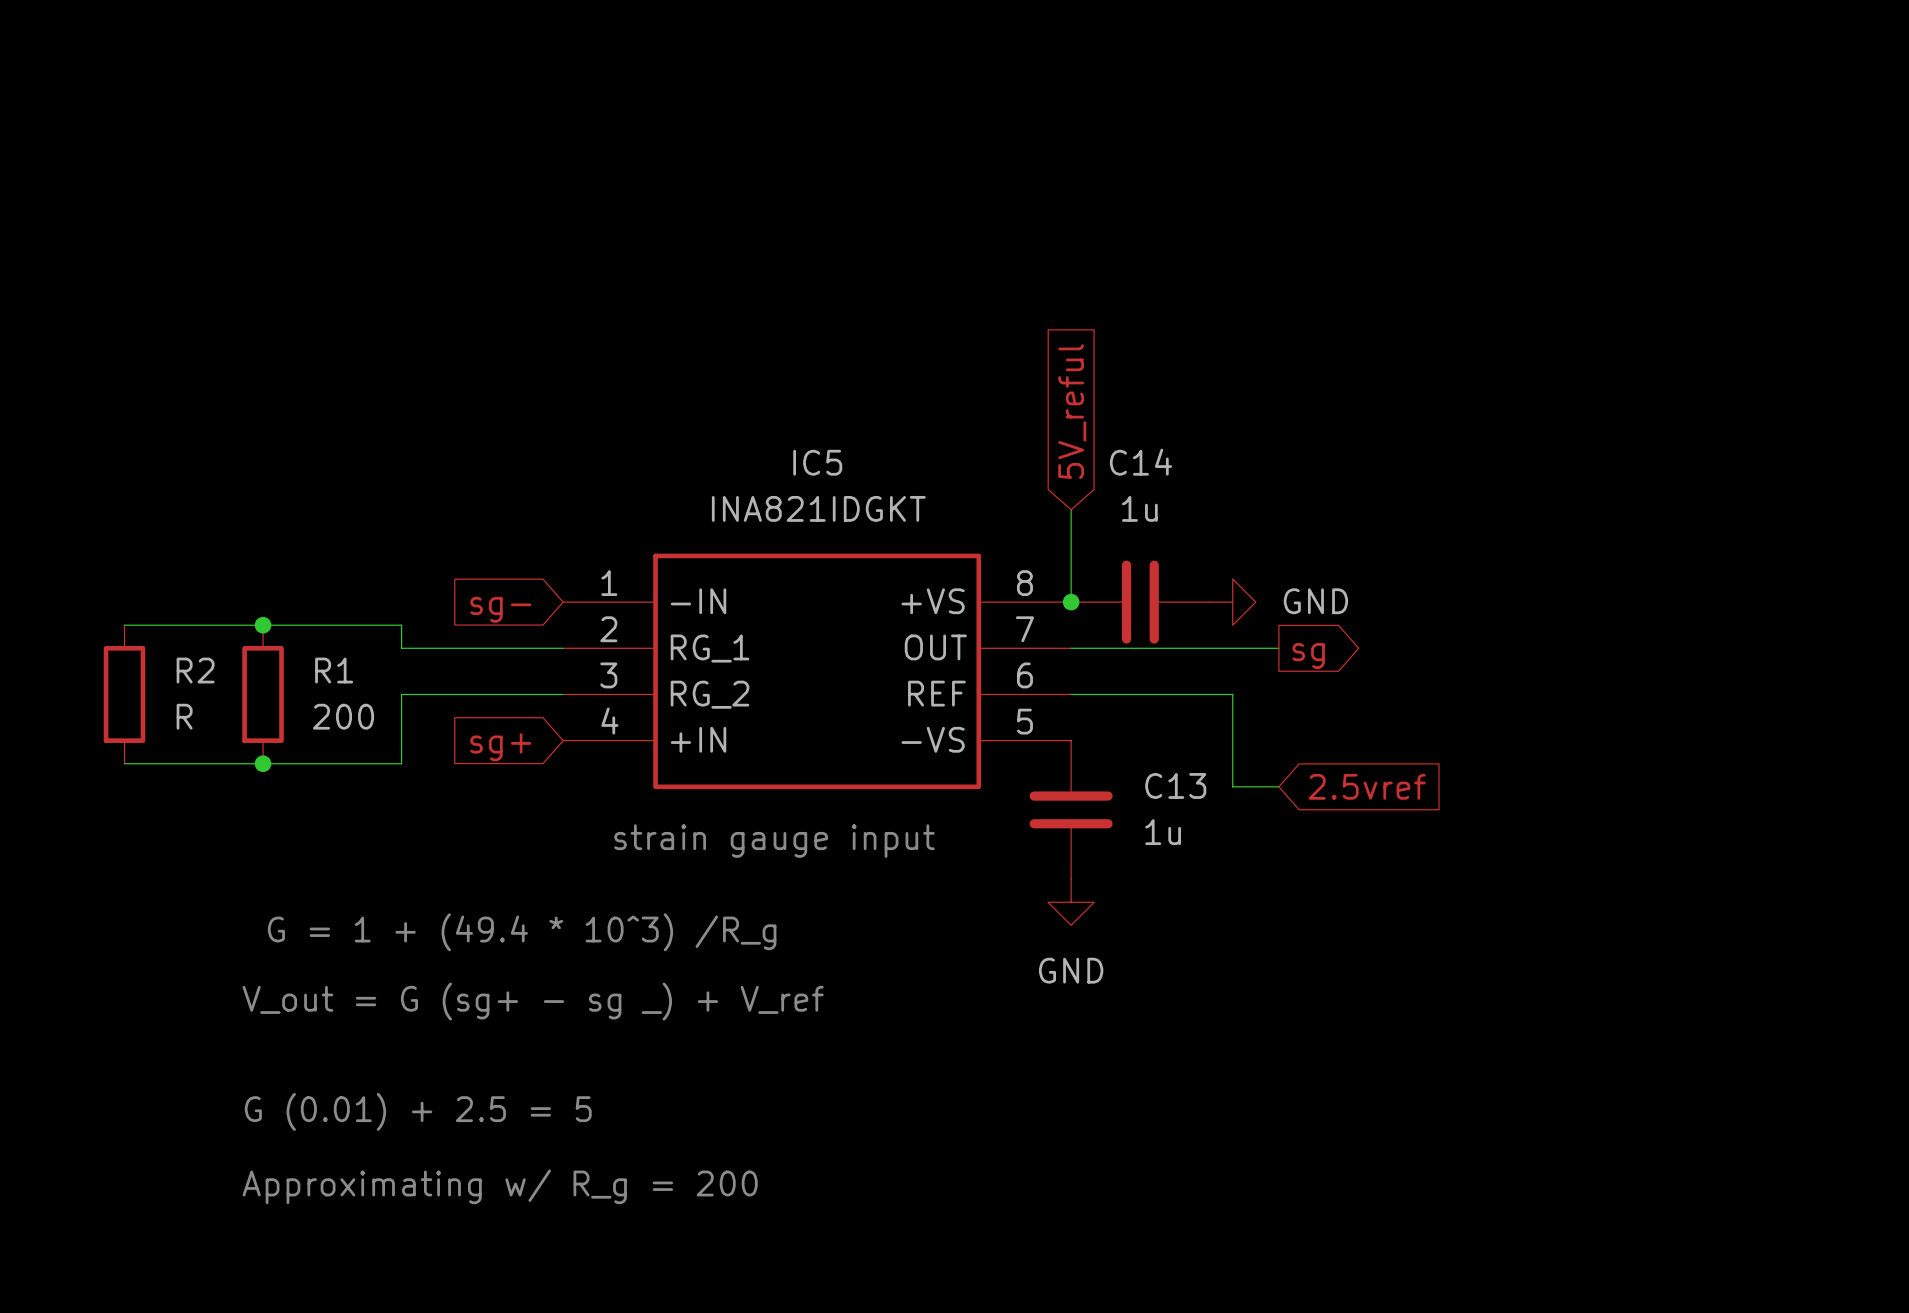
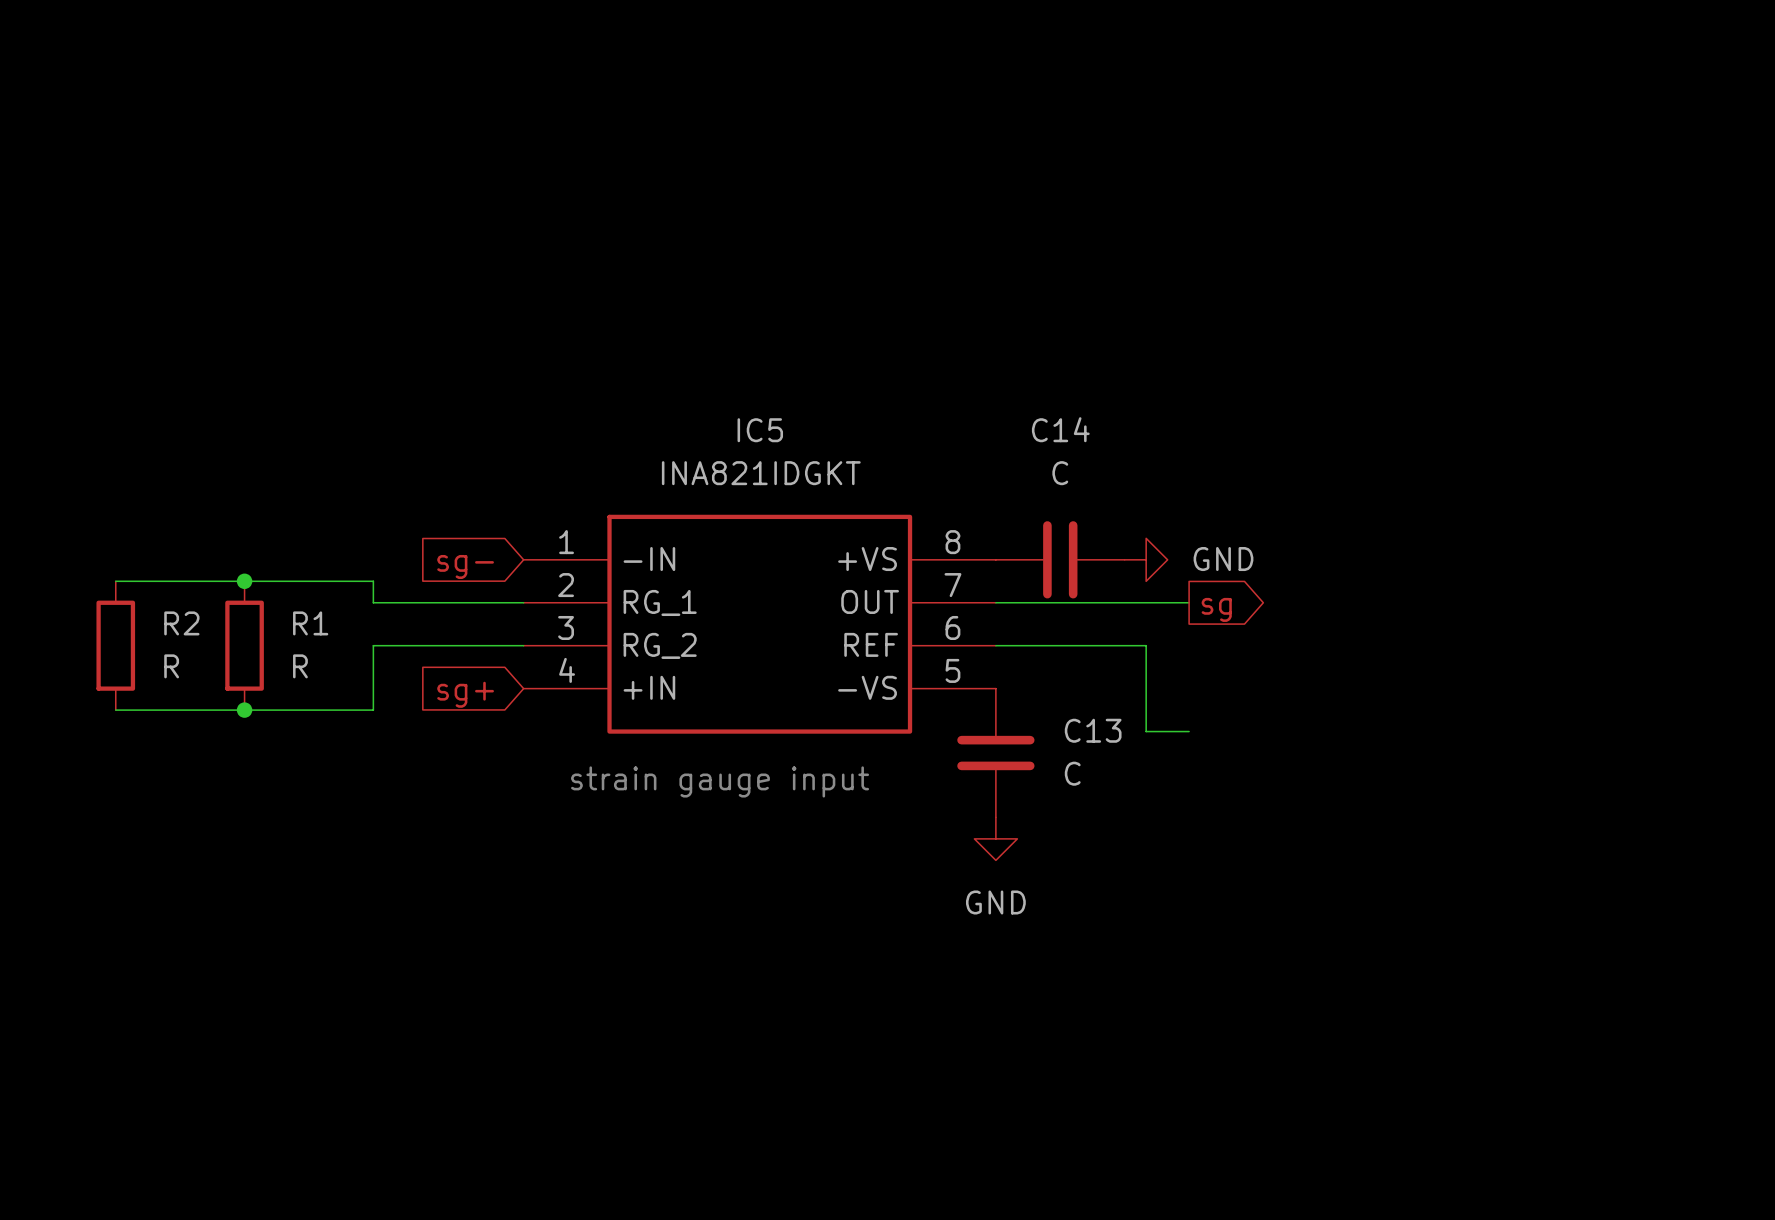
global label: 5V_reful (1072, 411) -> none
C14 value: 1u (1139, 508) -> C (1060, 473)
wire: (1071, 509) (1071, 602) -> none
junction: (1071, 602) -> none
R1 value: 200 (343, 716) -> R (300, 666)
global label: 2.5vref (1367, 786) -> none
C13 value: 1u (1163, 832) -> C (1072, 773)
text: G = 1 + (49.4 * 10^3) /R_g (522, 932) -> none
text: V_out = G (sg+ - sg _) + V_ref (533, 1001) -> none
text: G (0.01) + 2.5 = 5 (418, 1111) -> none
text: Approximating w/ R_g = 200 (500, 1186) -> none

